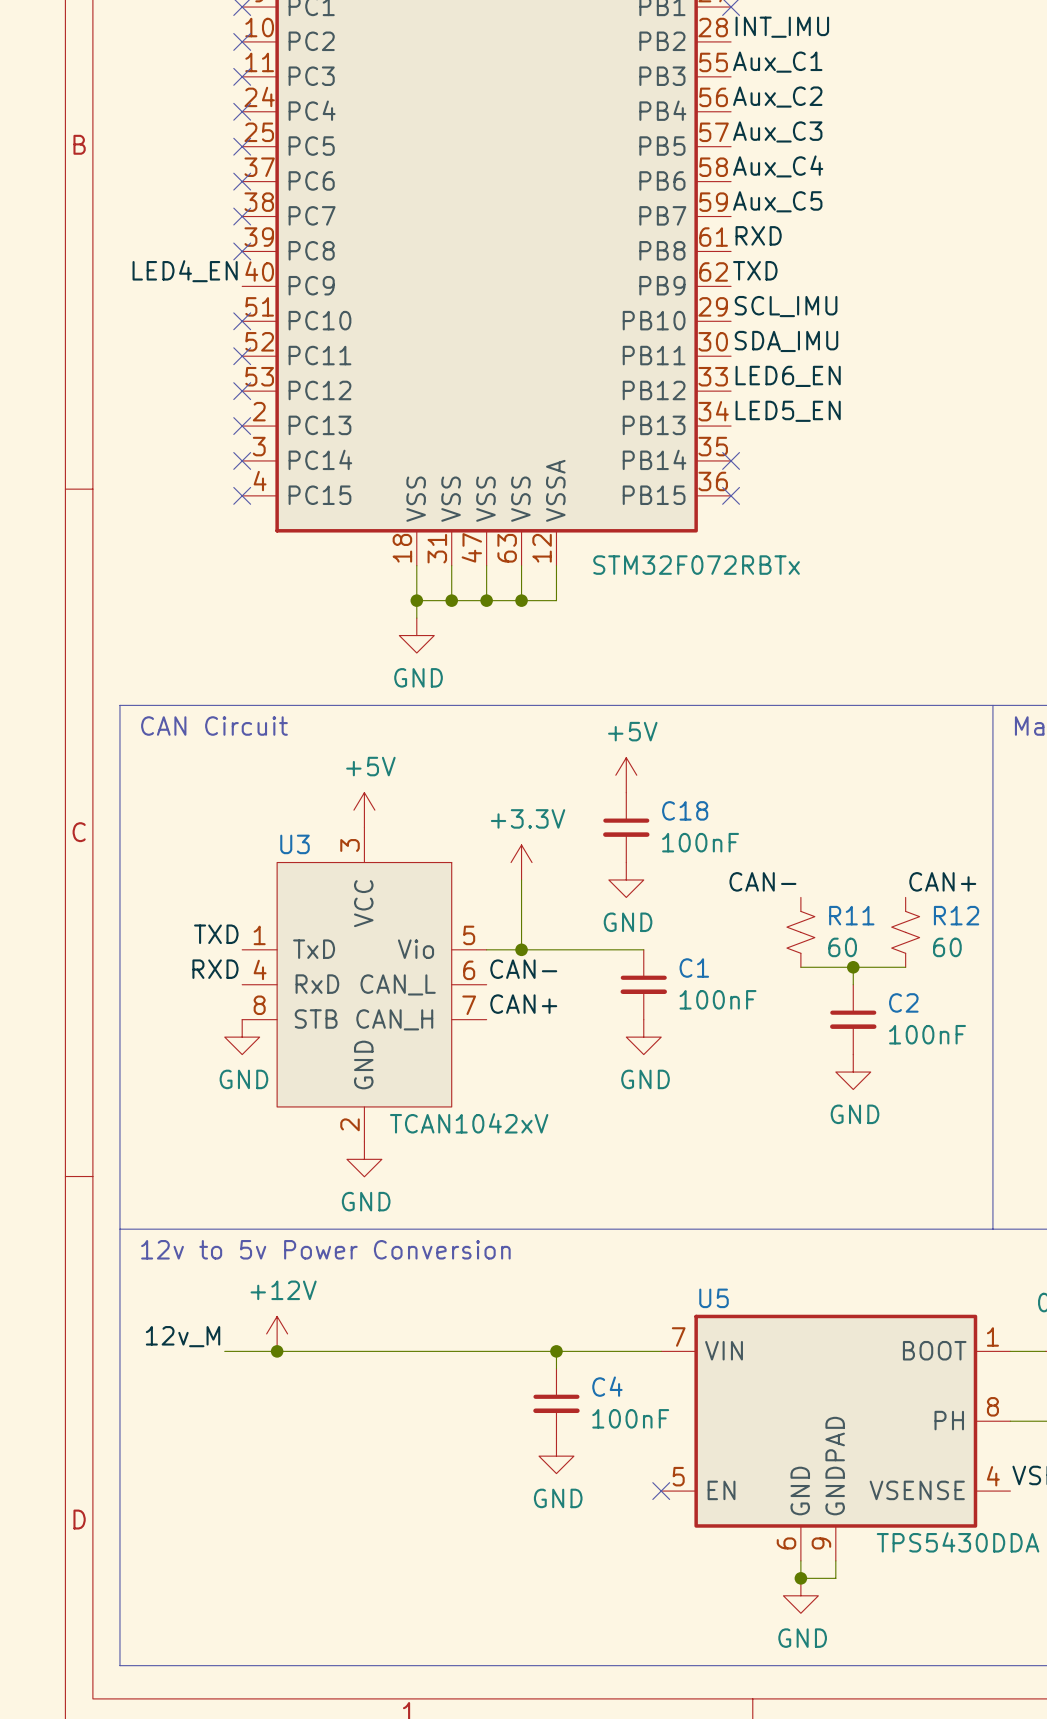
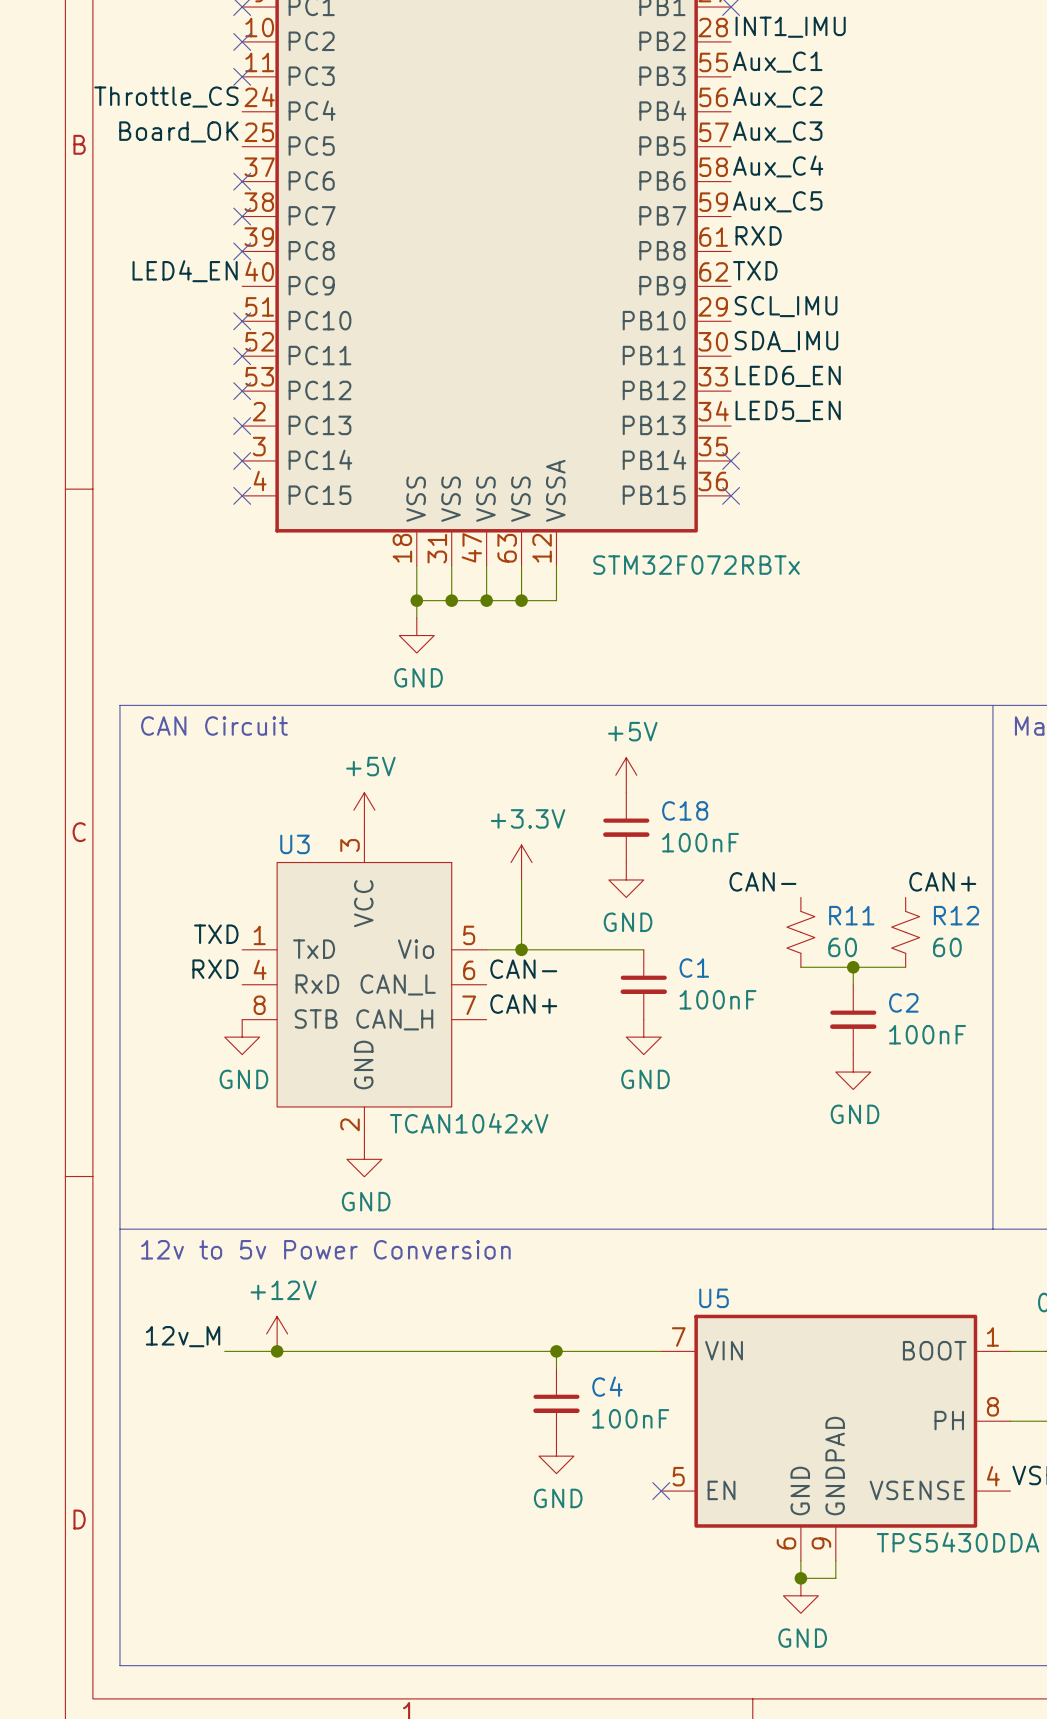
label: INT_IMU (782, 27) -> INT1_IMU (790, 27)
label: none -> Throttle_CS (166, 97)
no-connect mark: (242, 111) -> none
label: none -> Board_OK (178, 131)
no-connect mark: (242, 146) -> none

